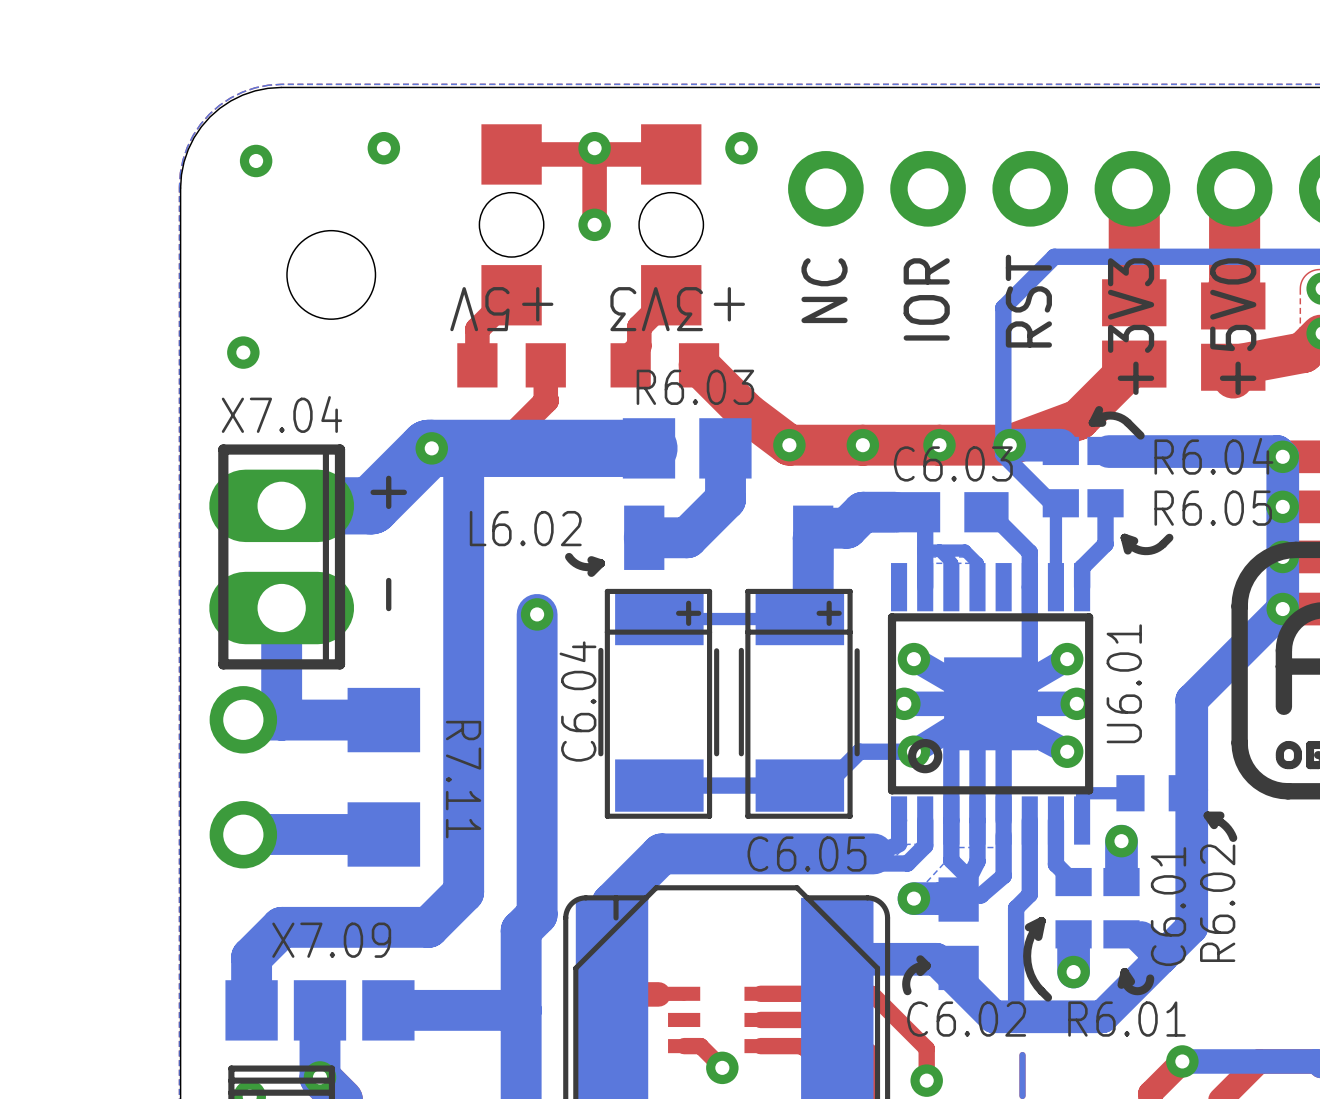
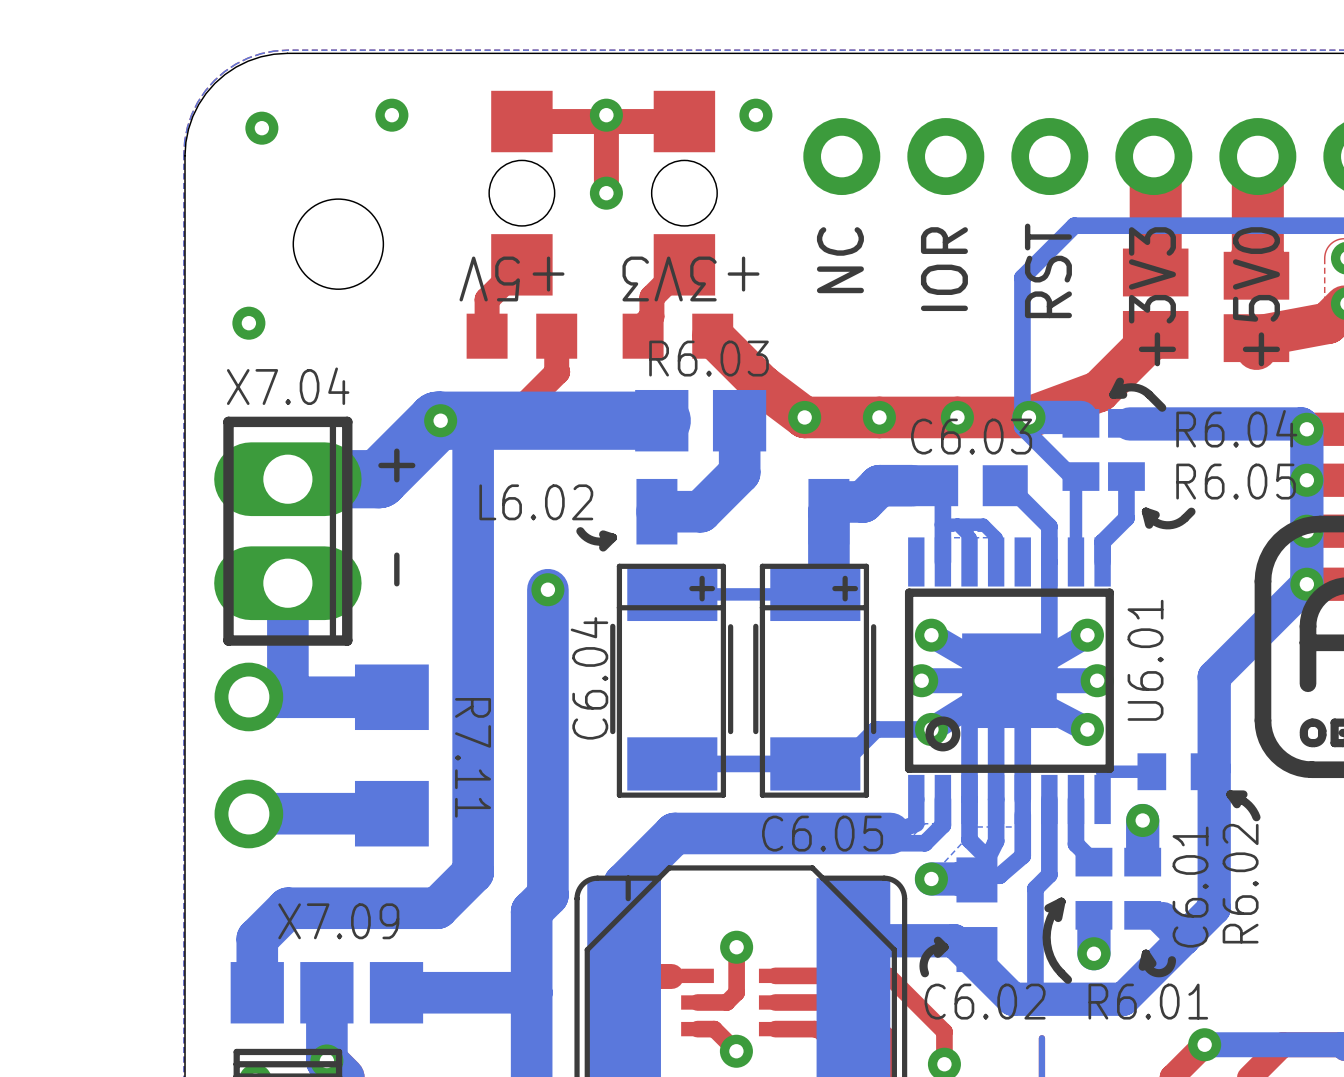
top track: none -> (736, 947) (736, 992) (726, 1002) (697, 1002)
via: none -> (736, 947)

